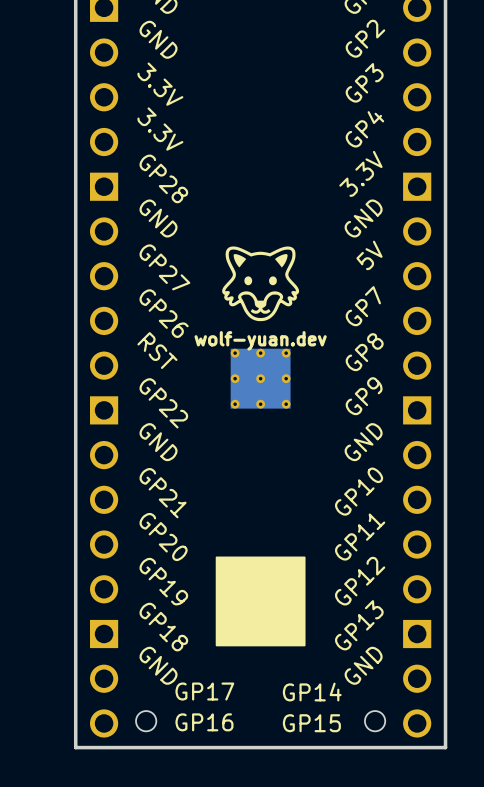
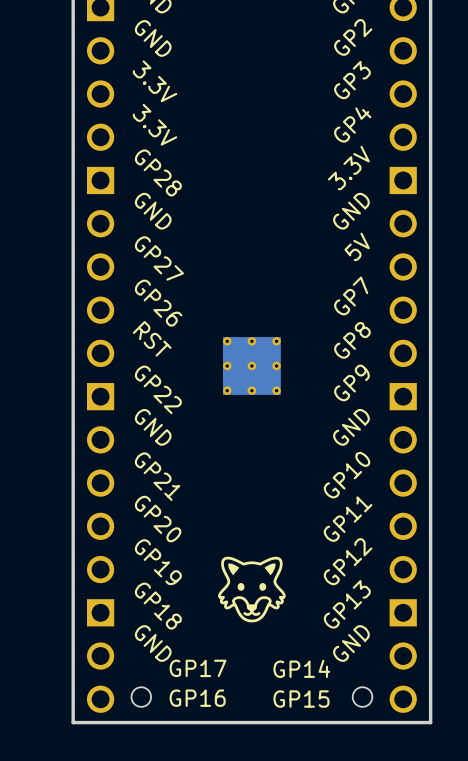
drawing: [222, 246, 300, 322] -> none
text: wolf-yuan.dev (260, 340) -> none
drawing shape: [215, 556, 306, 647] -> [218, 556, 286, 623]

